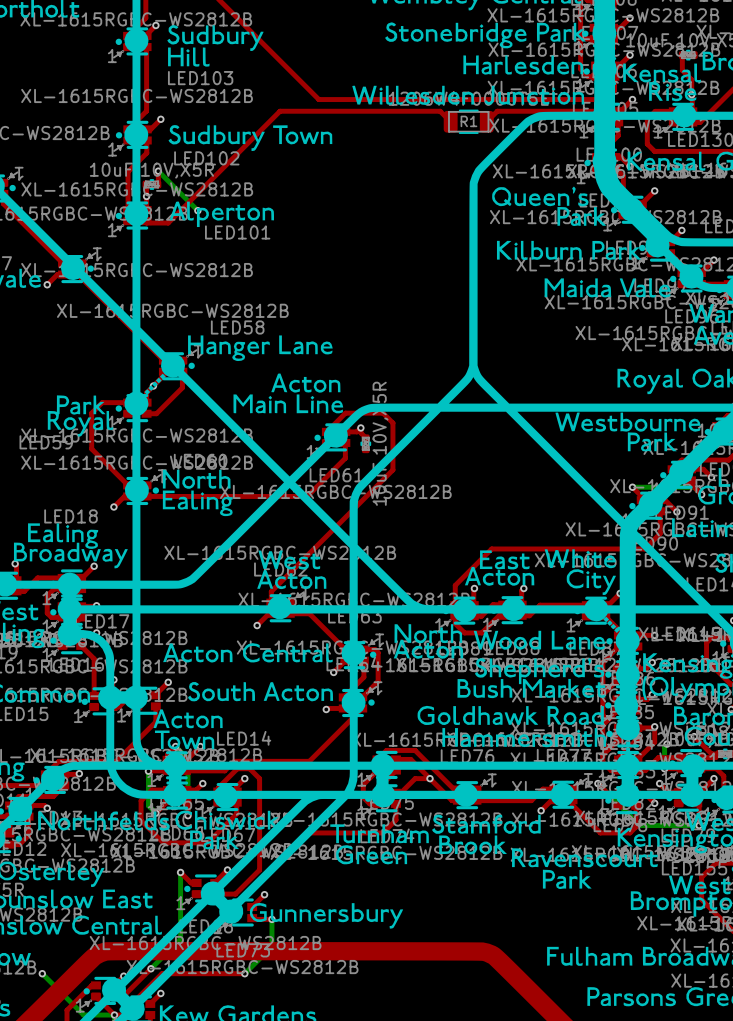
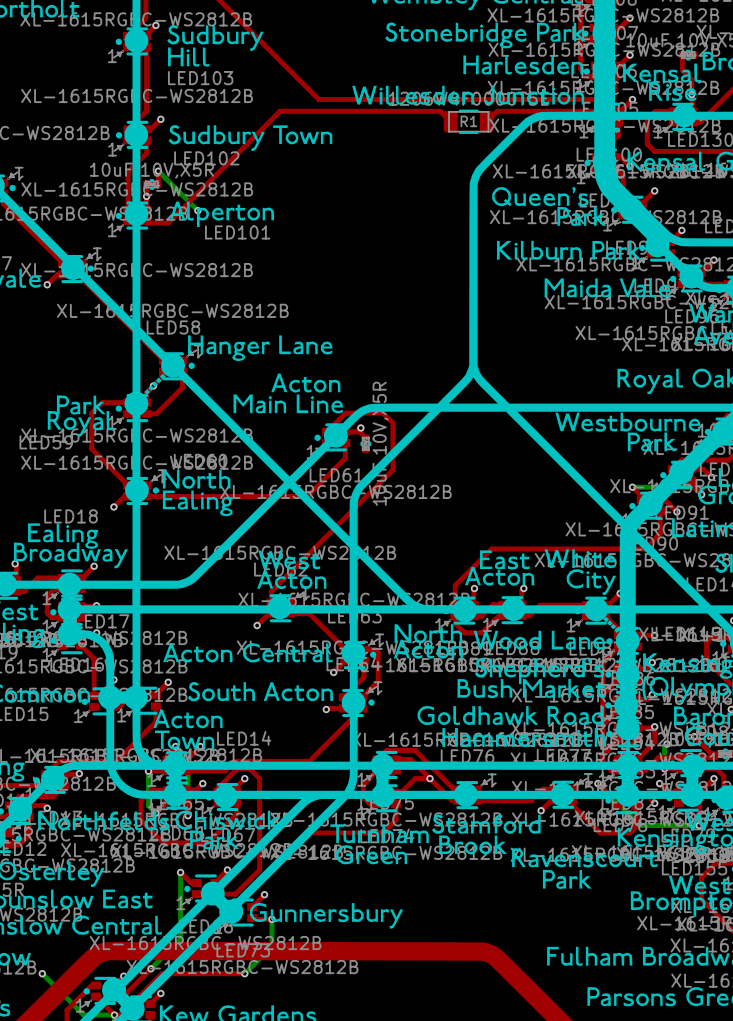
LED58 name position: LED58 (237, 327) -> LED58 (173, 327)

